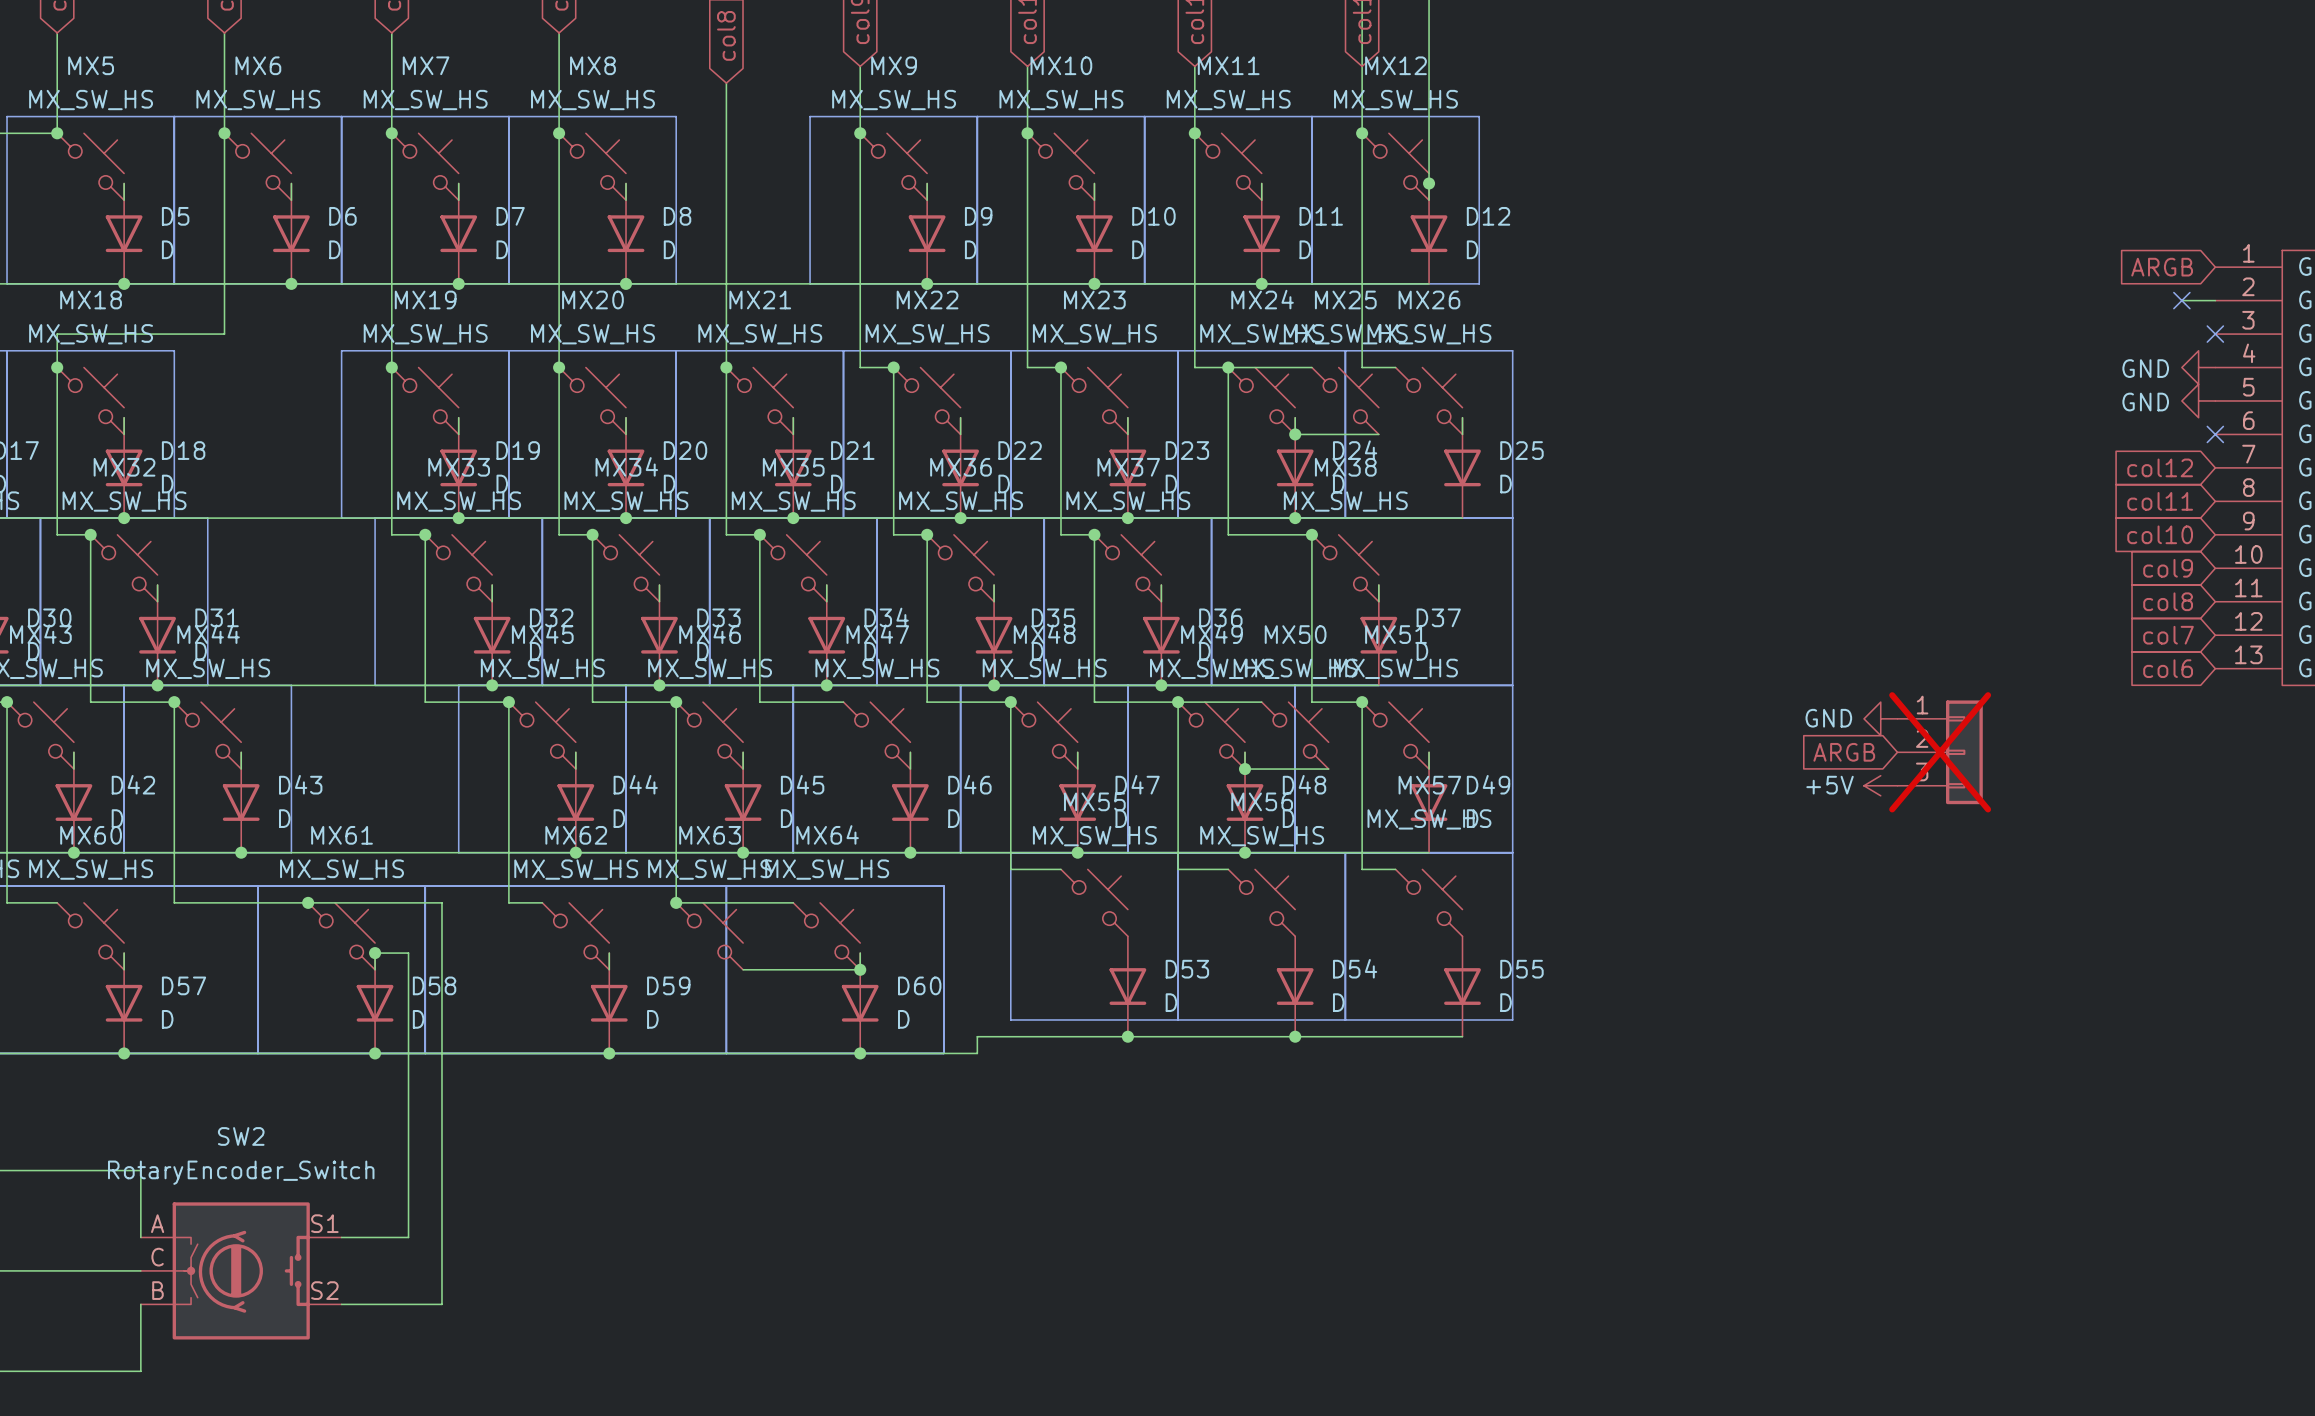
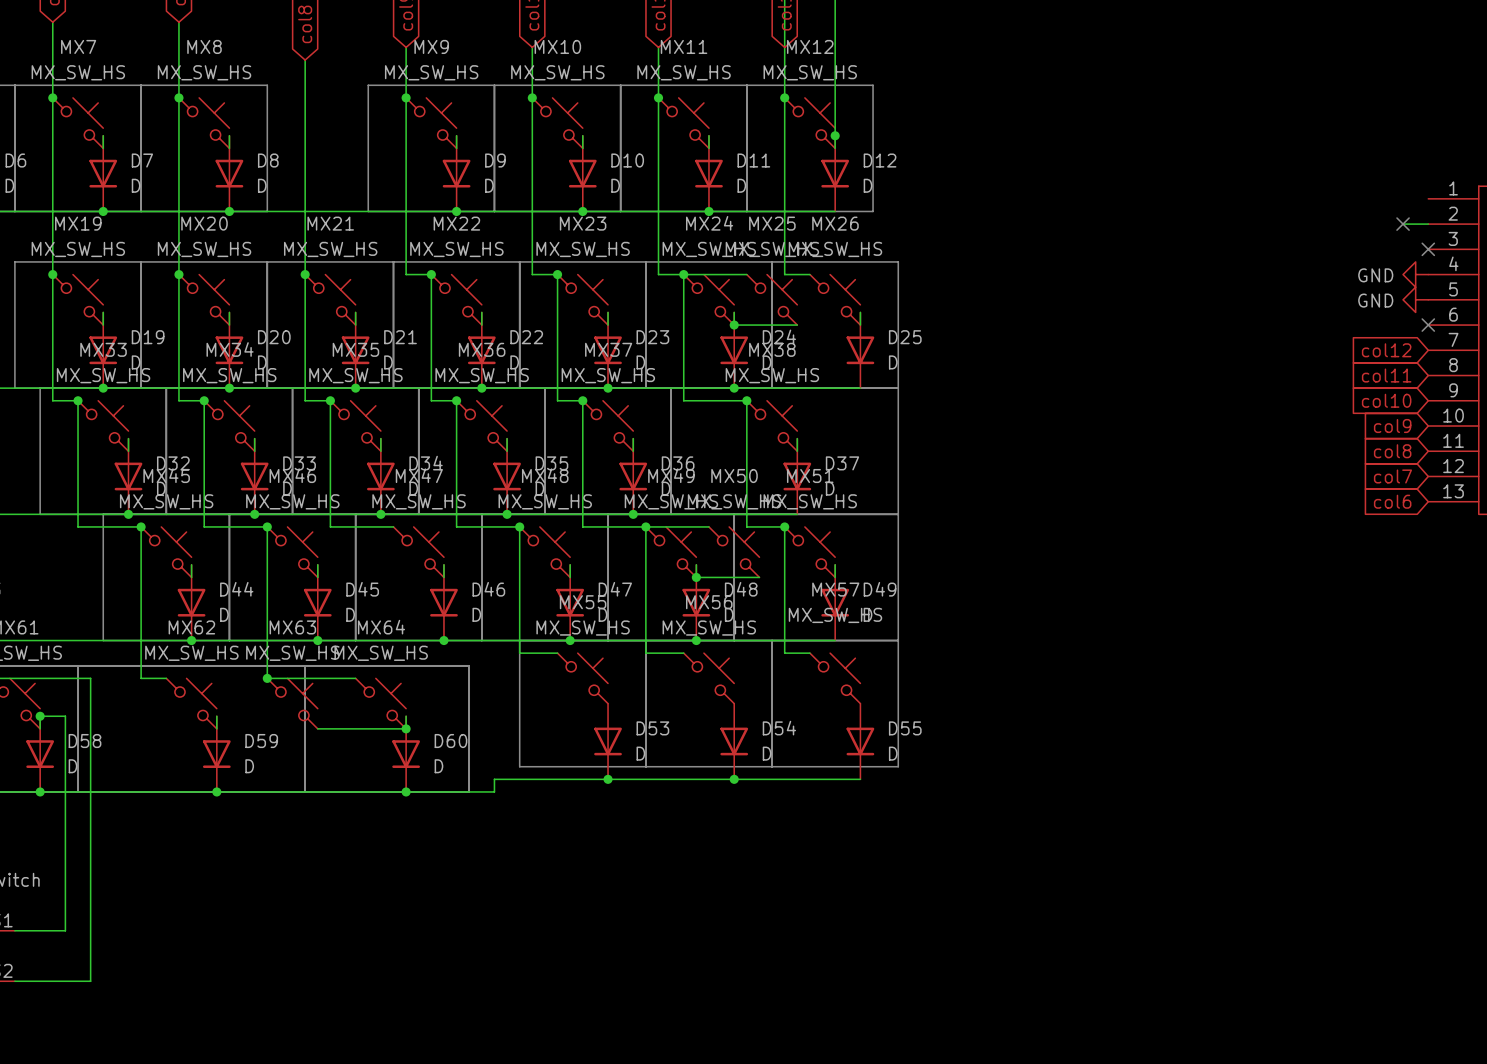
global label: ARGB (2162, 267) -> none
power symbol: GND (1880, 718) -> none
global label: ARGB (1844, 752) -> none
part: (1940, 752) -> none
power symbol: +5V (1880, 785) -> none

